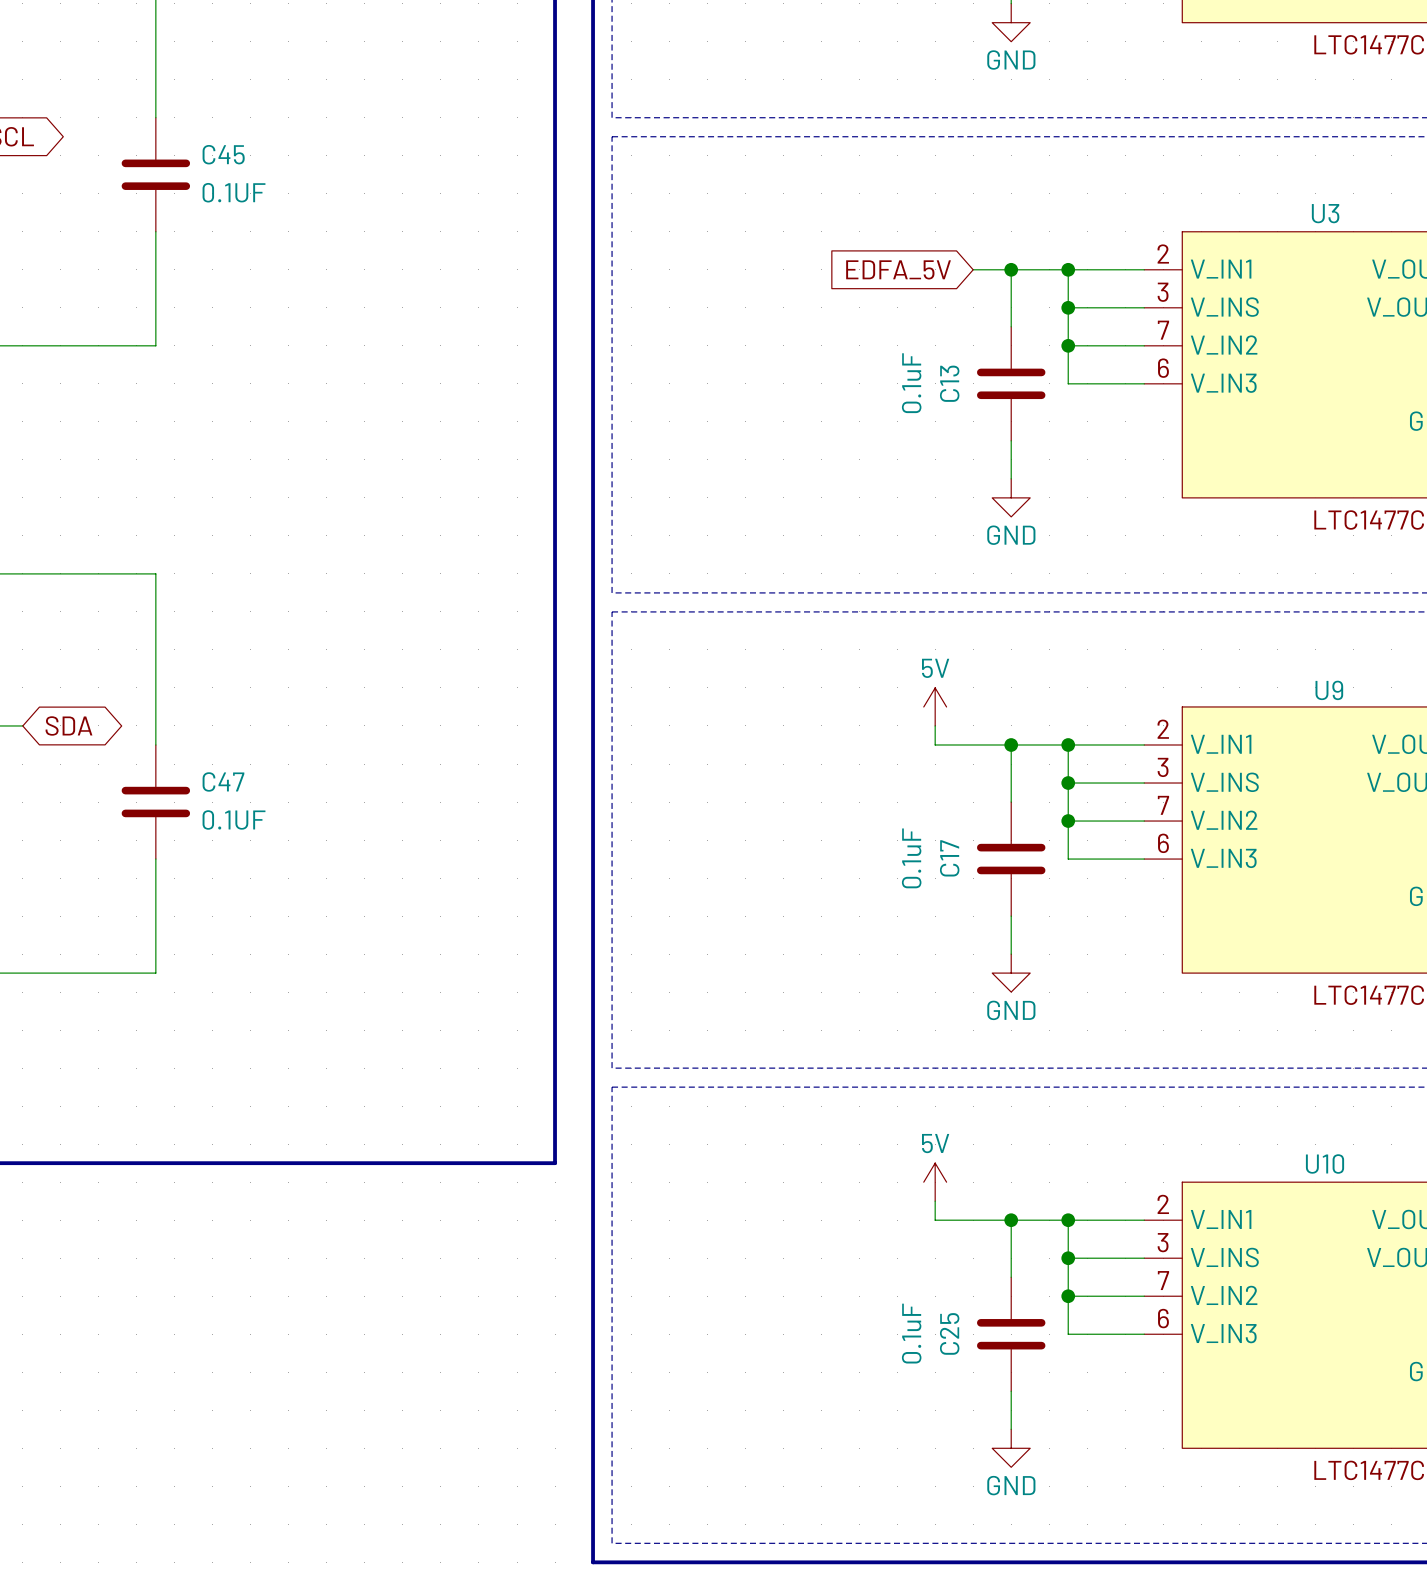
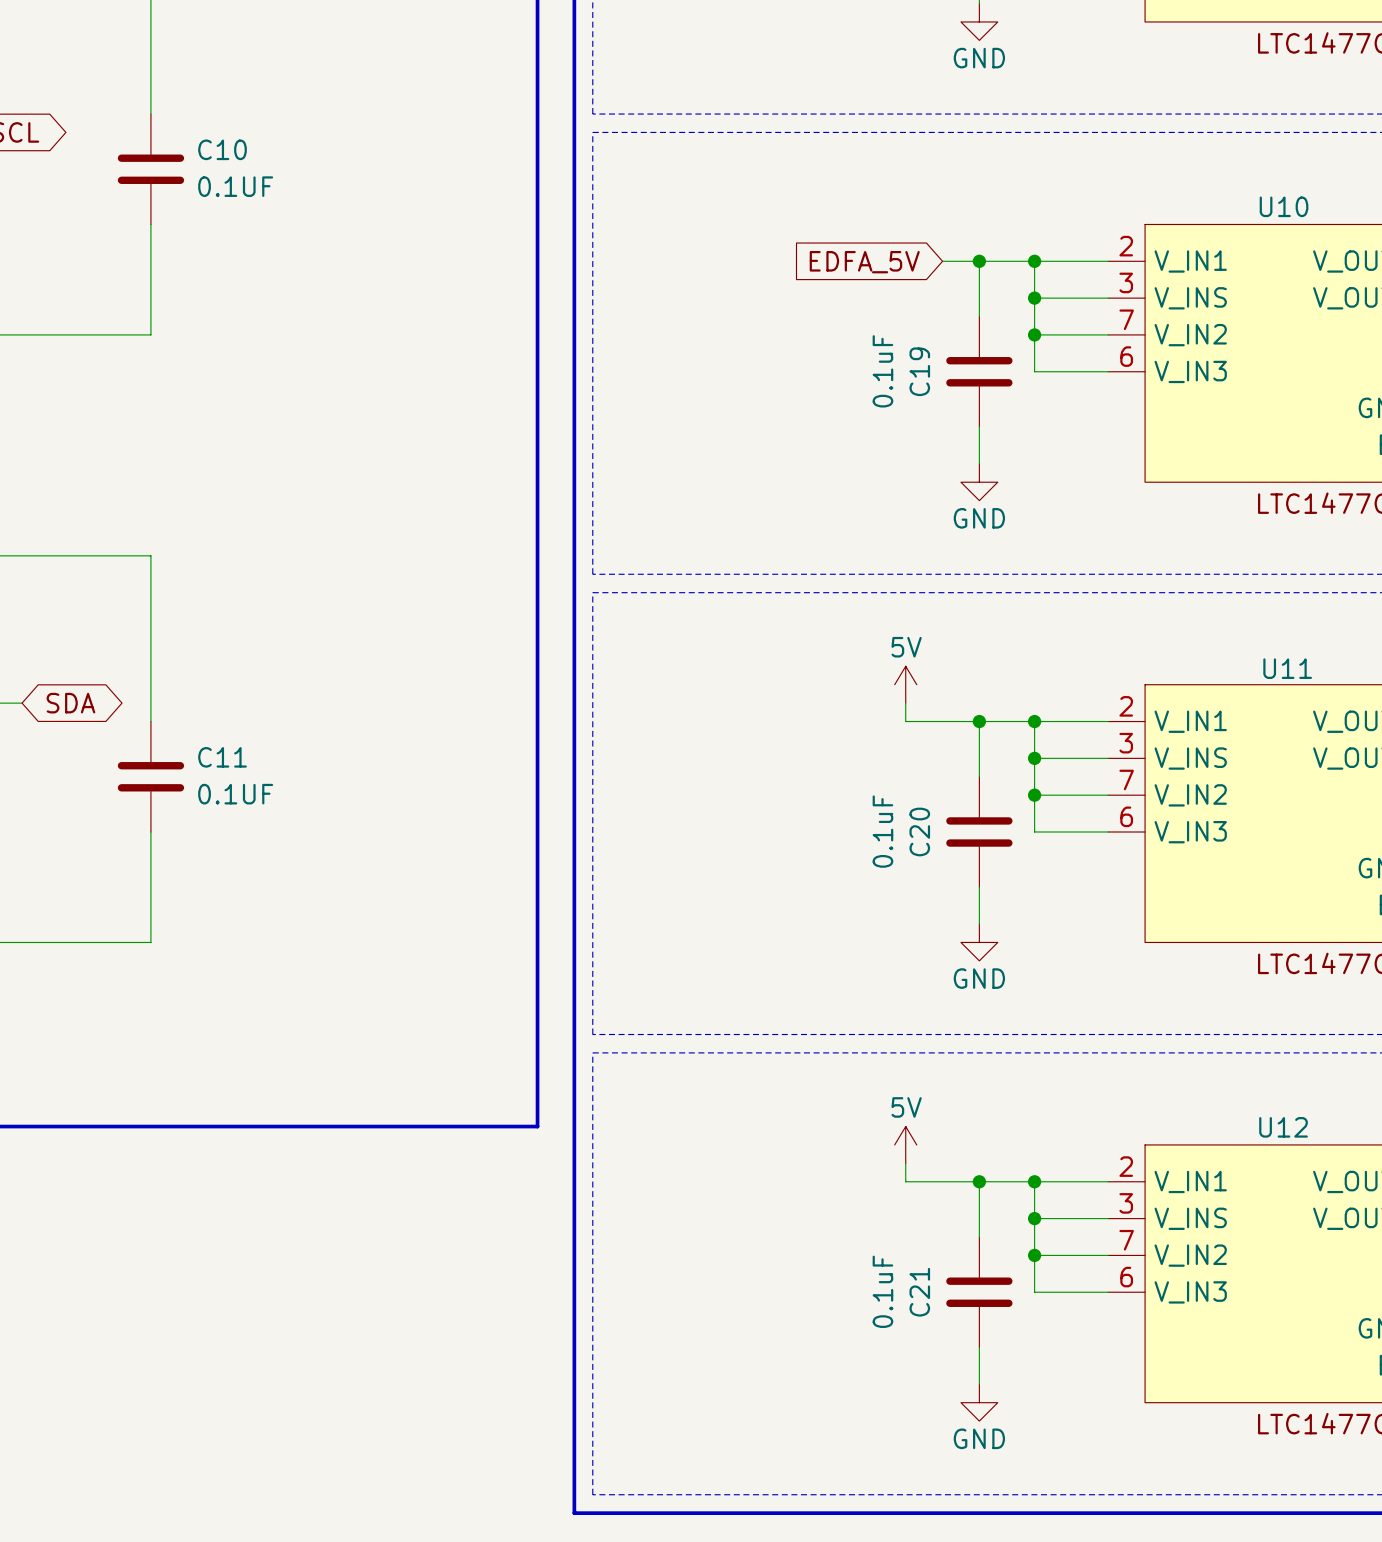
C45 name: C45 (223, 154) -> C10 (222, 149)
U3 name: U3 (1325, 213) -> U10 (1284, 206)
C13 name: C13 (949, 383) -> C19 (919, 371)
U9 name: U9 (1329, 690) -> U11 (1287, 668)
C47 name: C47 (223, 781) -> C11 (222, 757)
C17 name: C17 (949, 858) -> C20 (919, 831)
U10 name: U10 (1325, 1164) -> U12 (1283, 1127)
C25 name: C25 (949, 1333) -> C21 (919, 1292)

